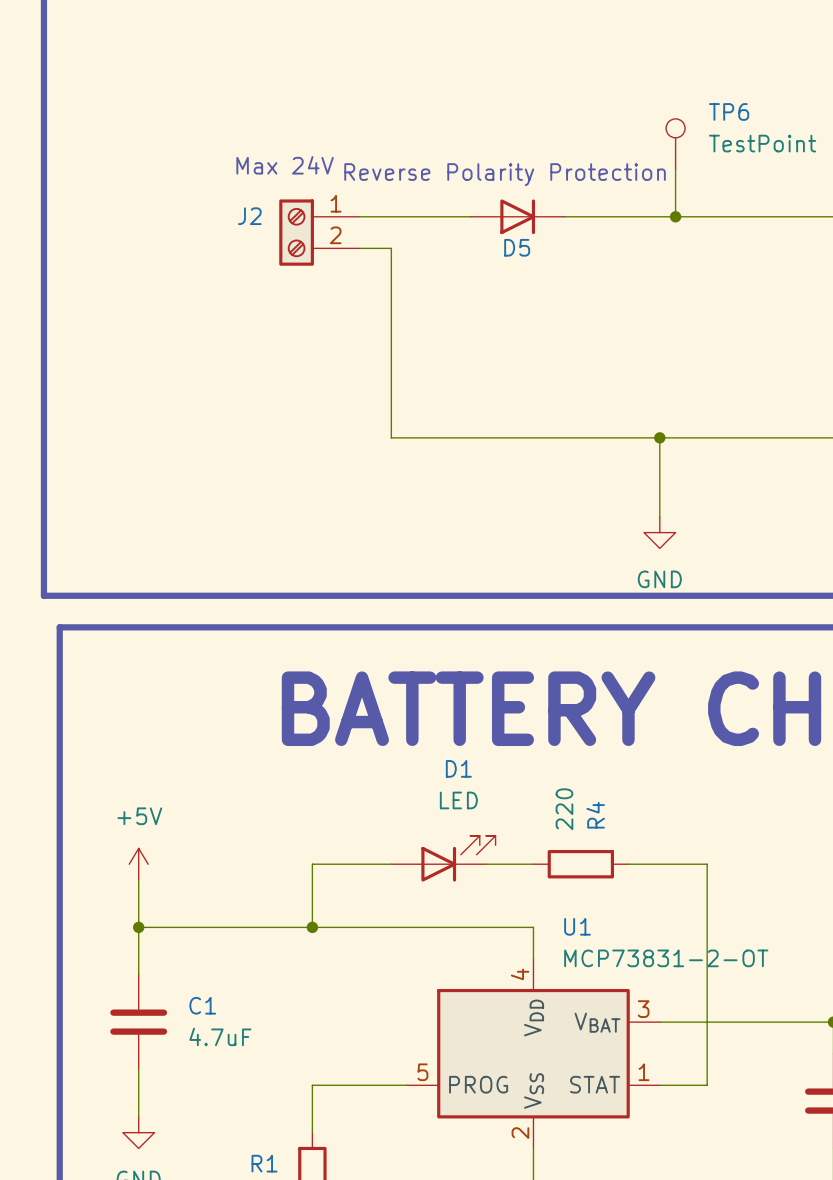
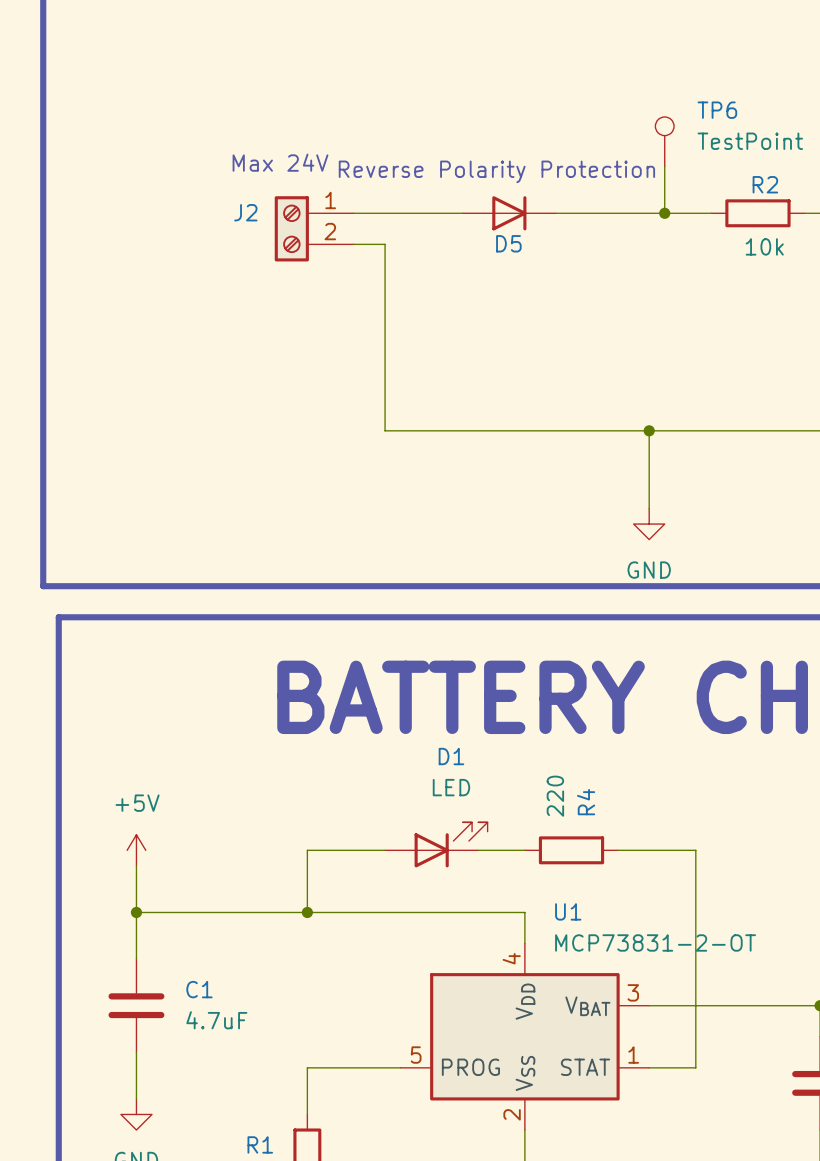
wire: (722, 216) (817, 216) -> none
R2: none -> 10k (757, 213)

